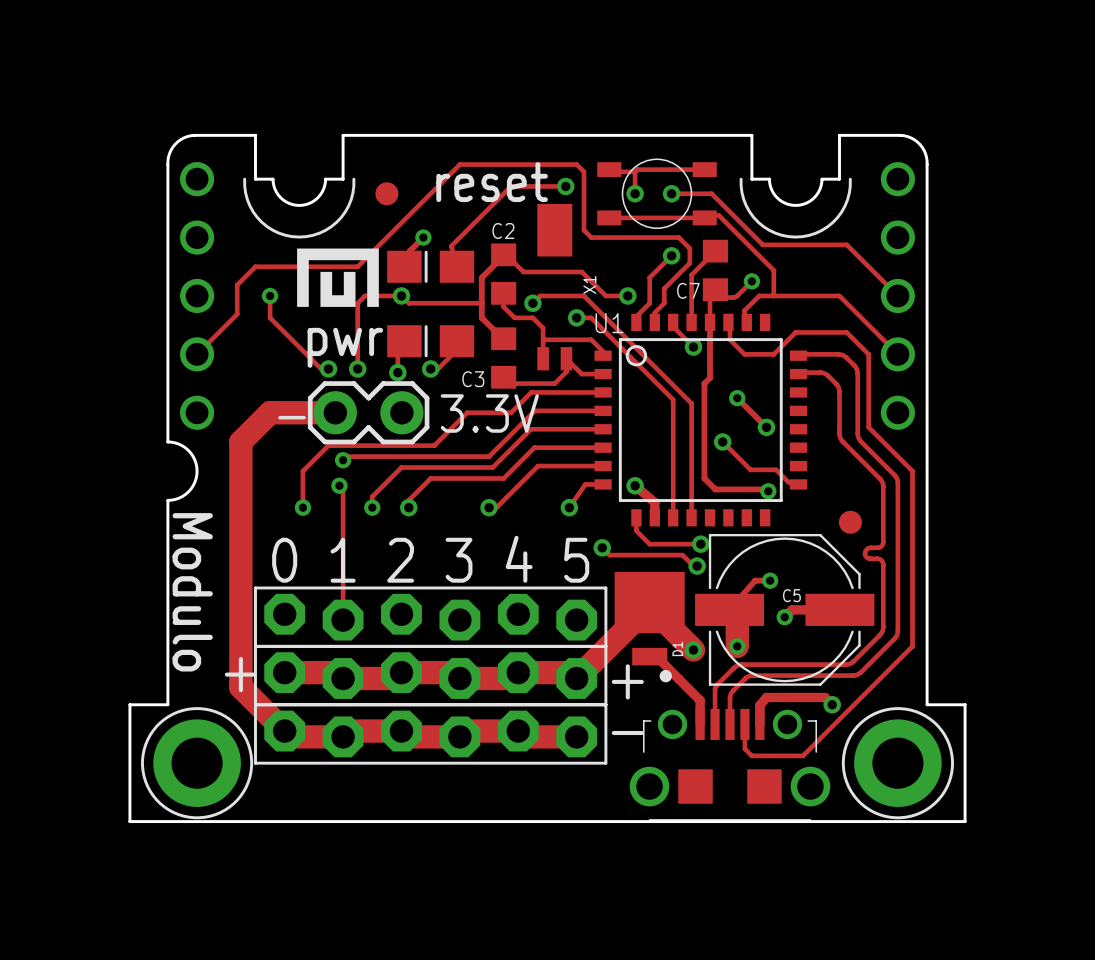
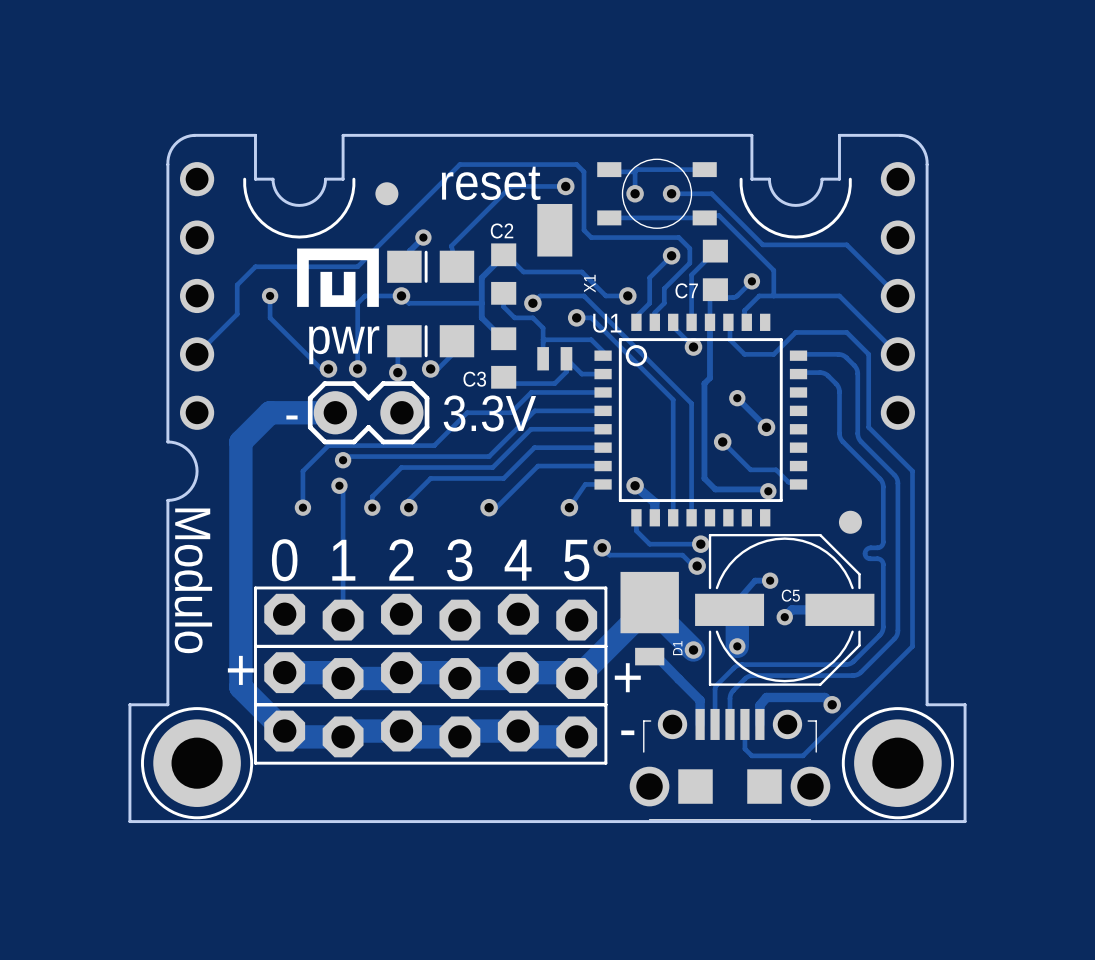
D1 footprint: [614, 571, 685, 683] -> [620, 571, 679, 666]

